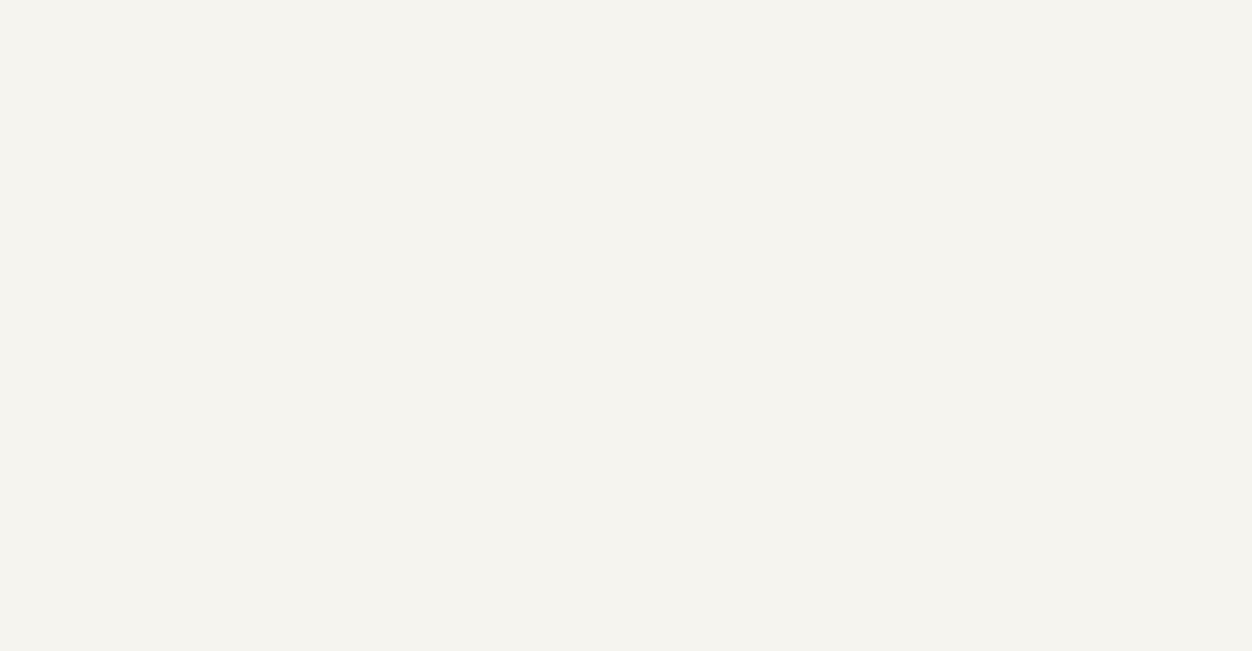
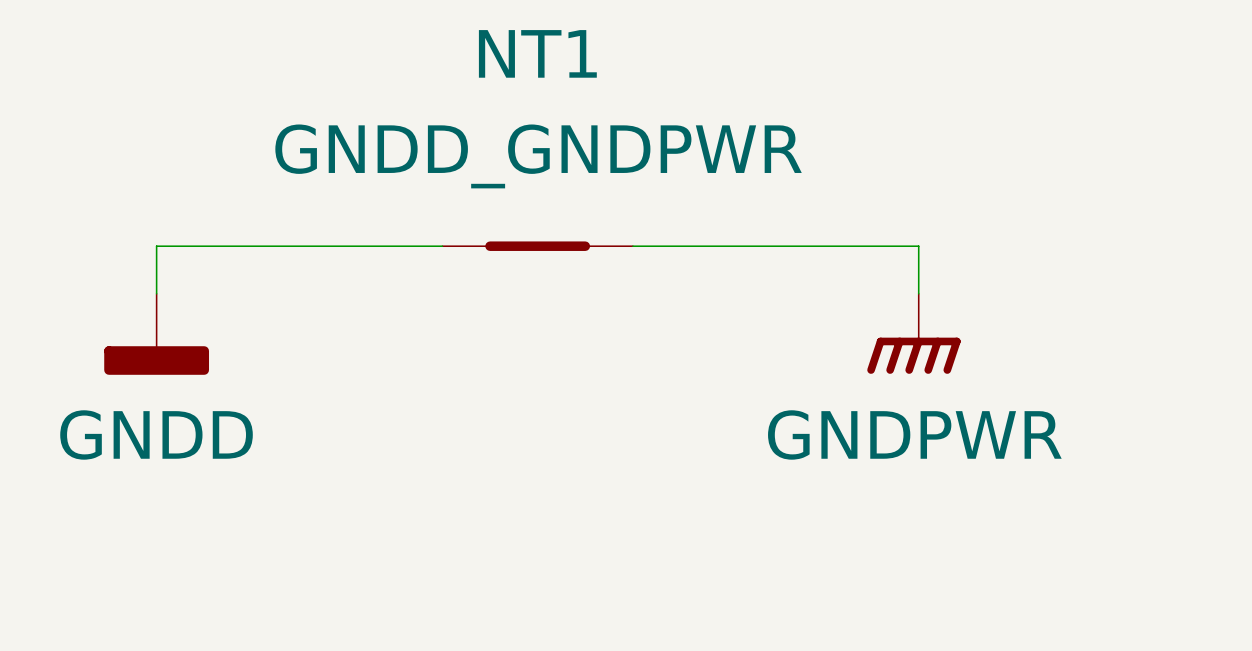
wire: none -> (442, 246) (156, 246) (156, 293)
NT1: none -> GNDD_GNDPWR (537, 246)
wire: none -> (632, 246) (918, 246) (918, 293)
power symbol: none -> GNDPWR (913, 333)
power symbol: none -> GNDD (156, 334)

